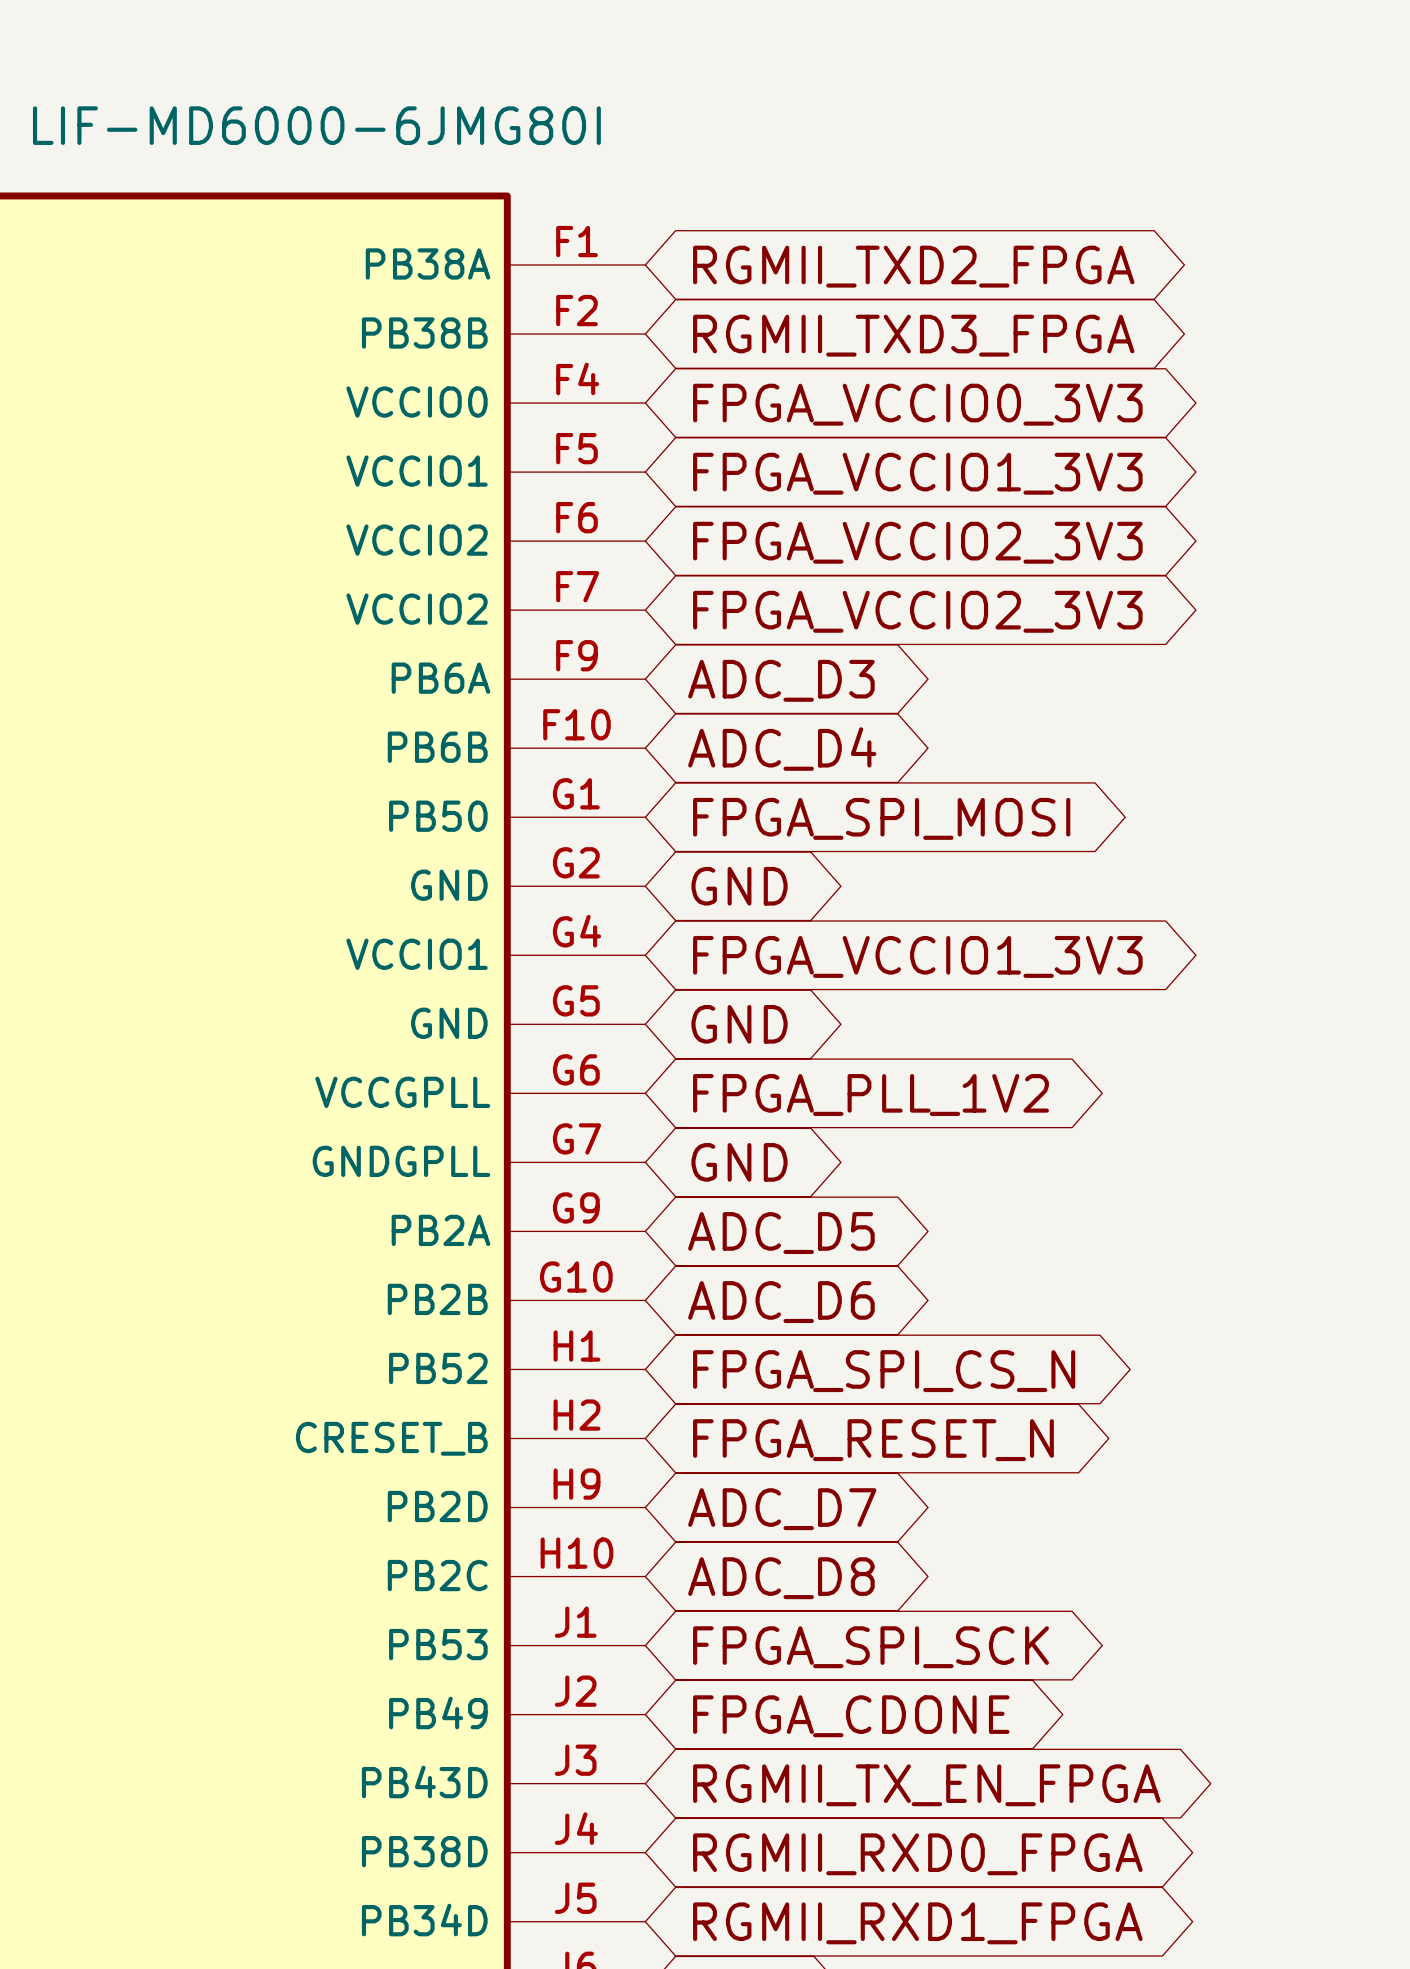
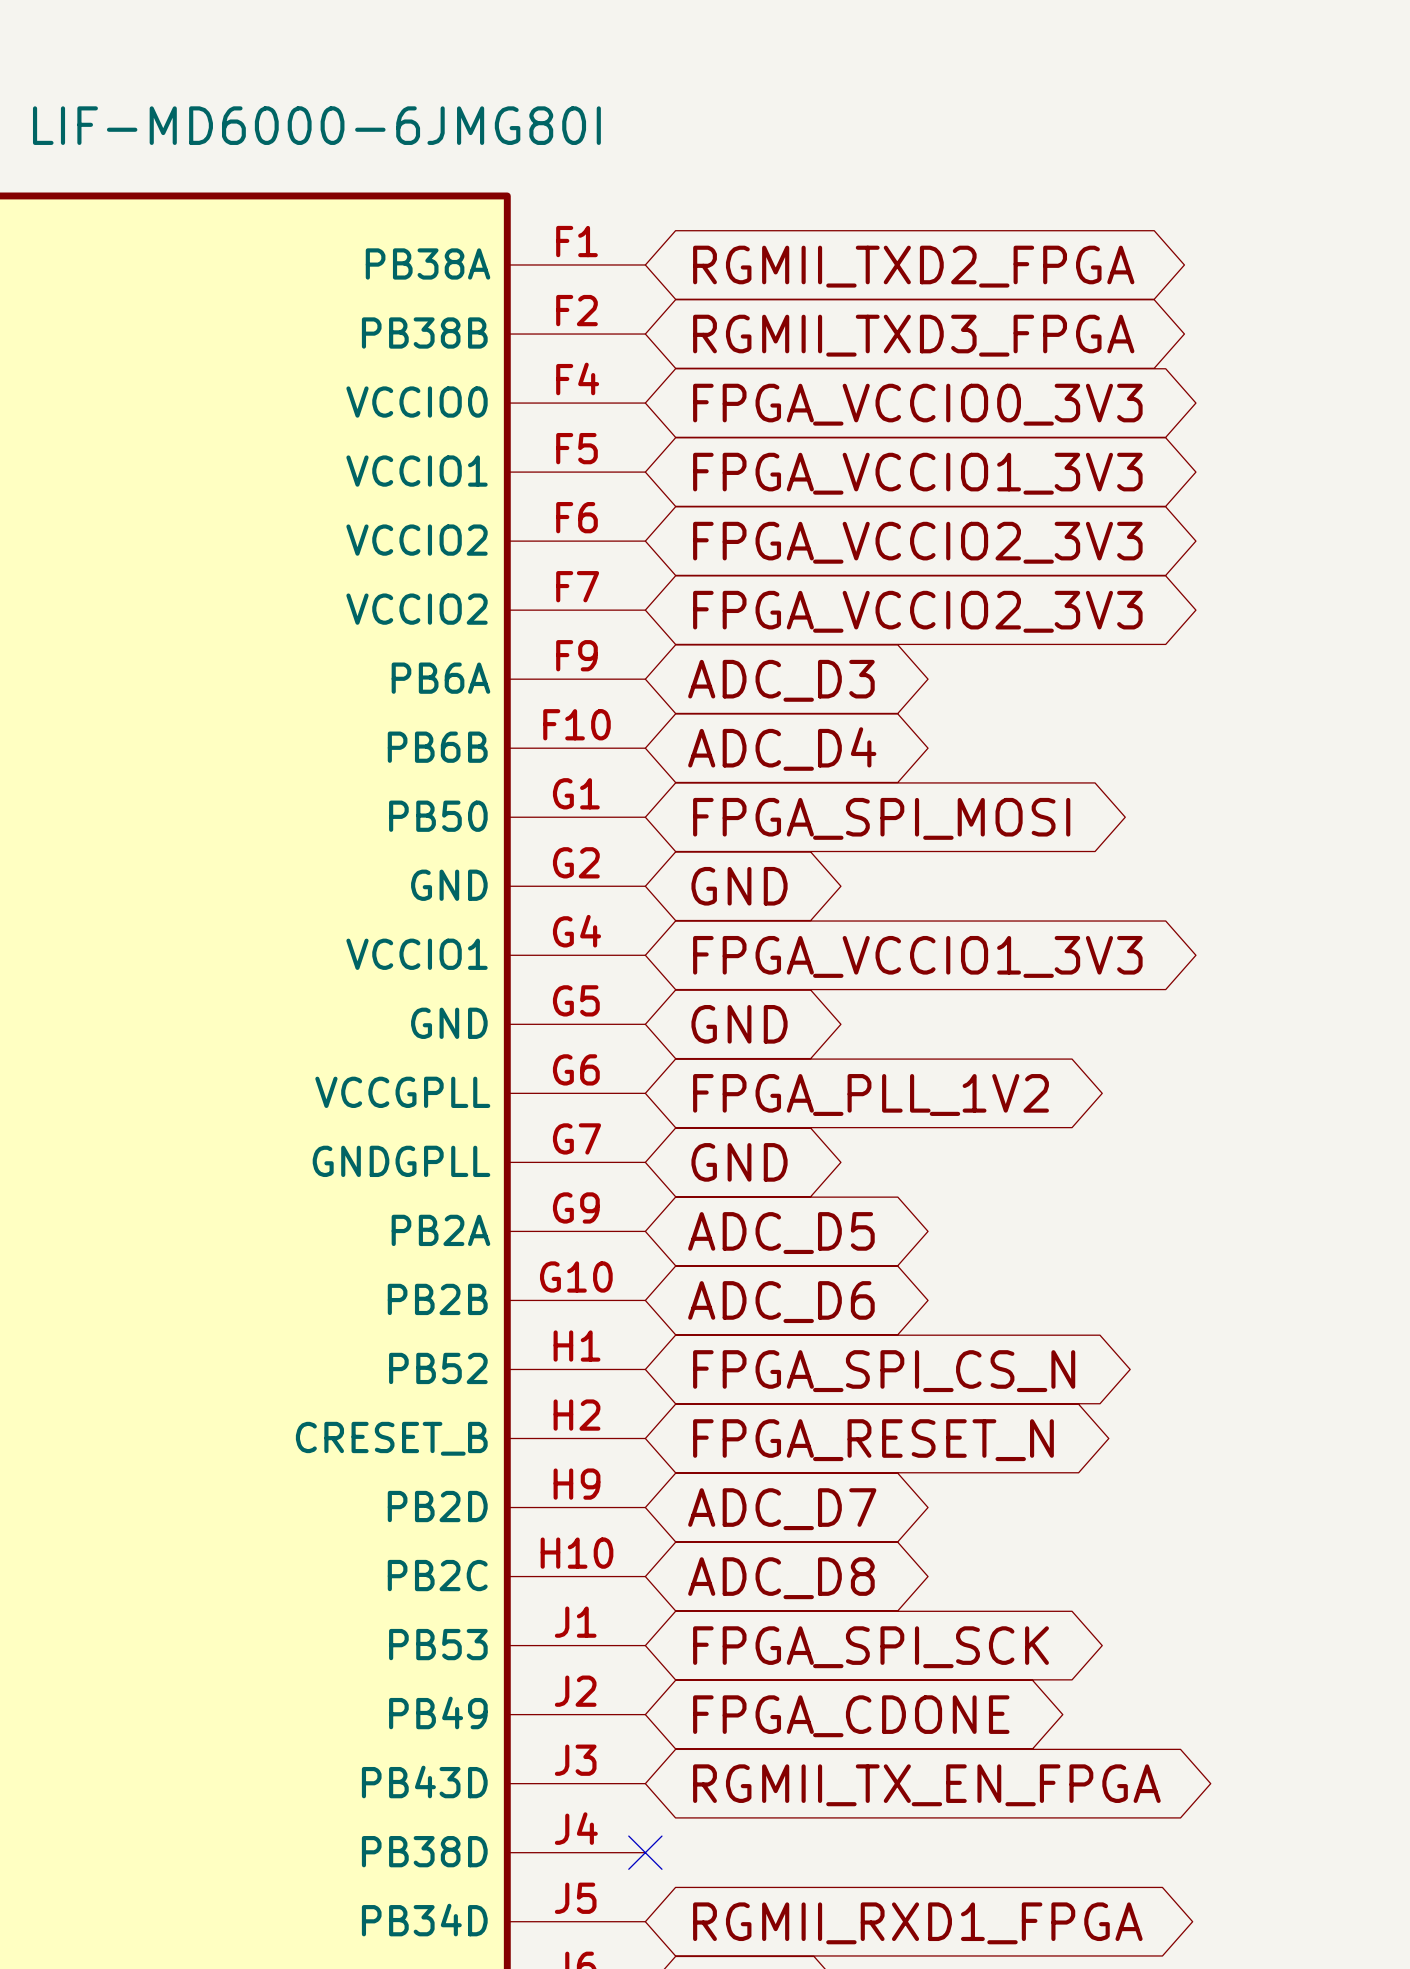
no-connect mark: none -> (645, 1852)
global label: RGMII_RXD0_FPGA (917, 1854) -> none

